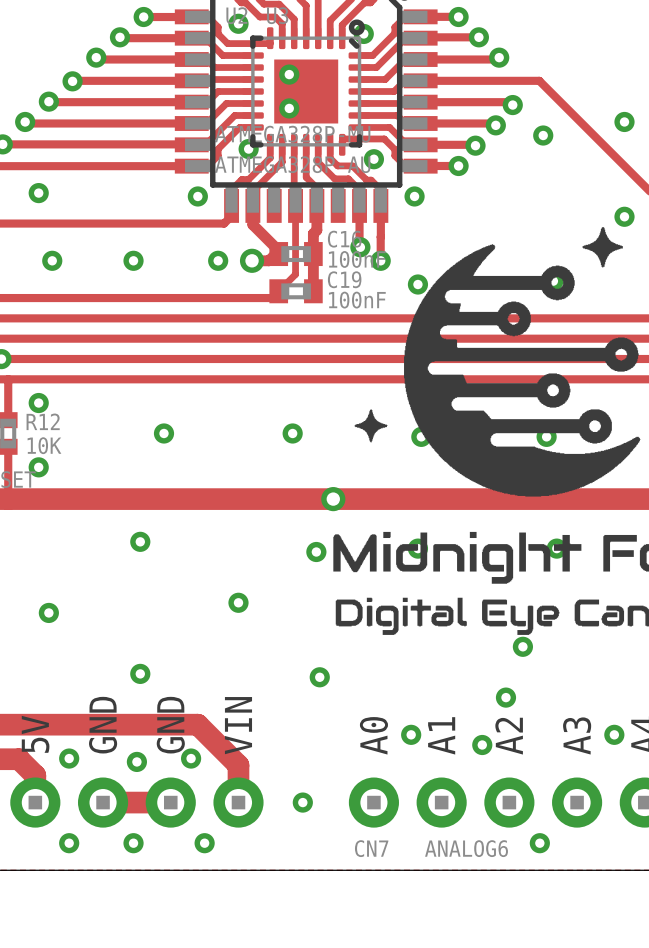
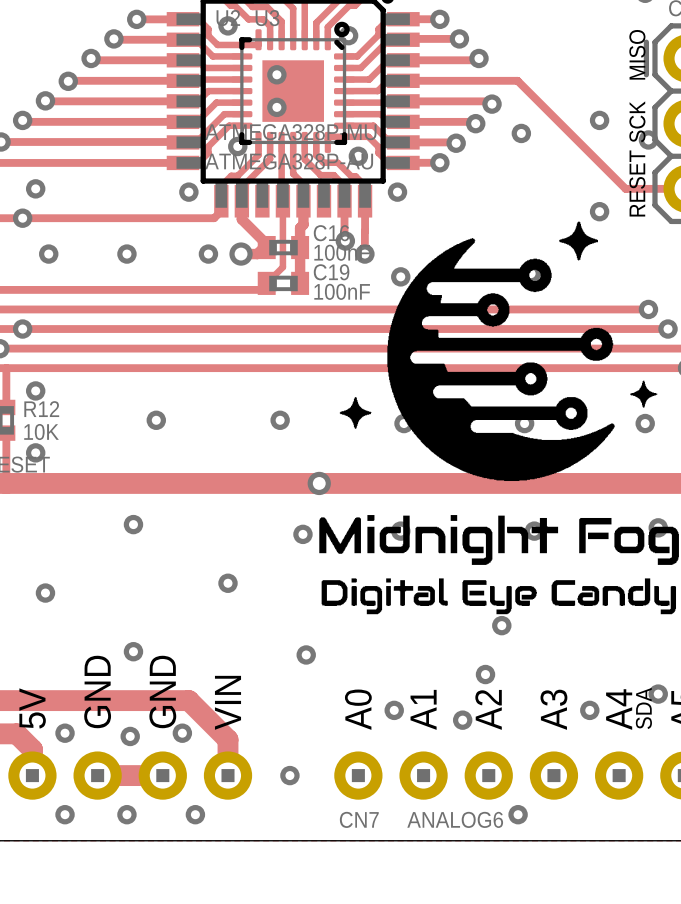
via: none -> (22, 218)
via: none -> (22, 329)

